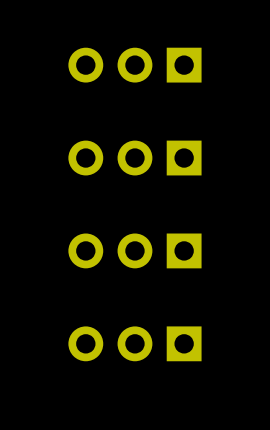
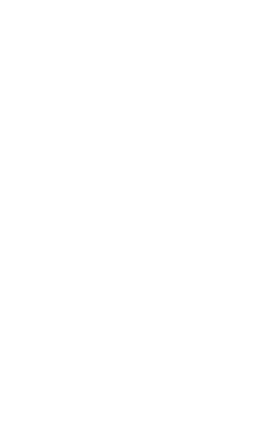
part: (134, 65) -> none
part: (134, 158) -> none
part: (134, 250) -> none
part: (134, 343) -> none

